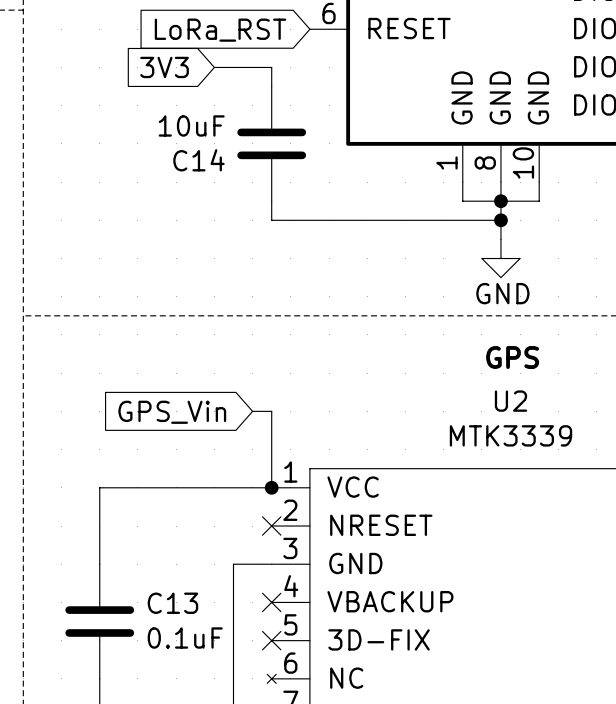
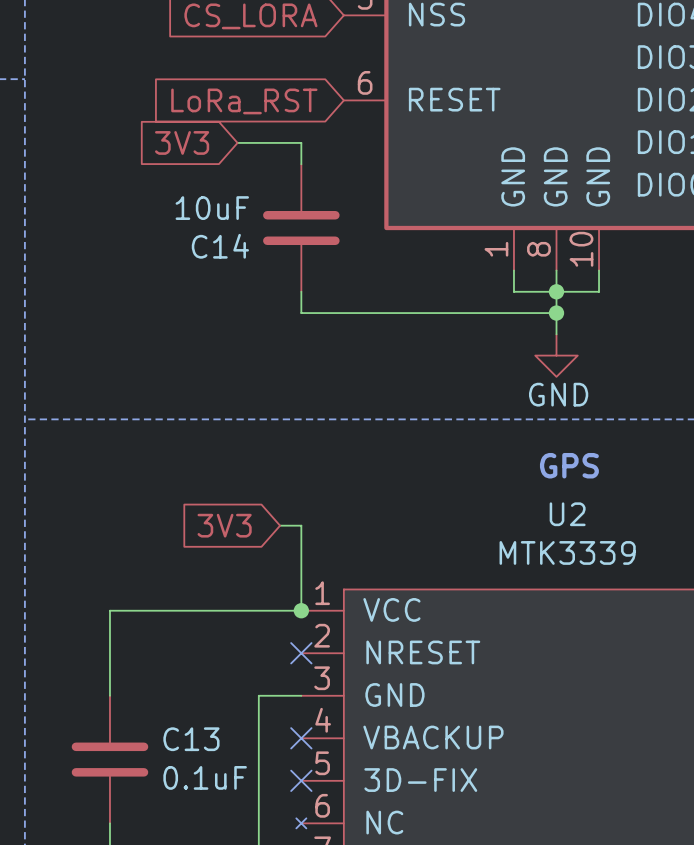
global label: GPS_Vin (172, 412) -> 3V3 (224, 525)

